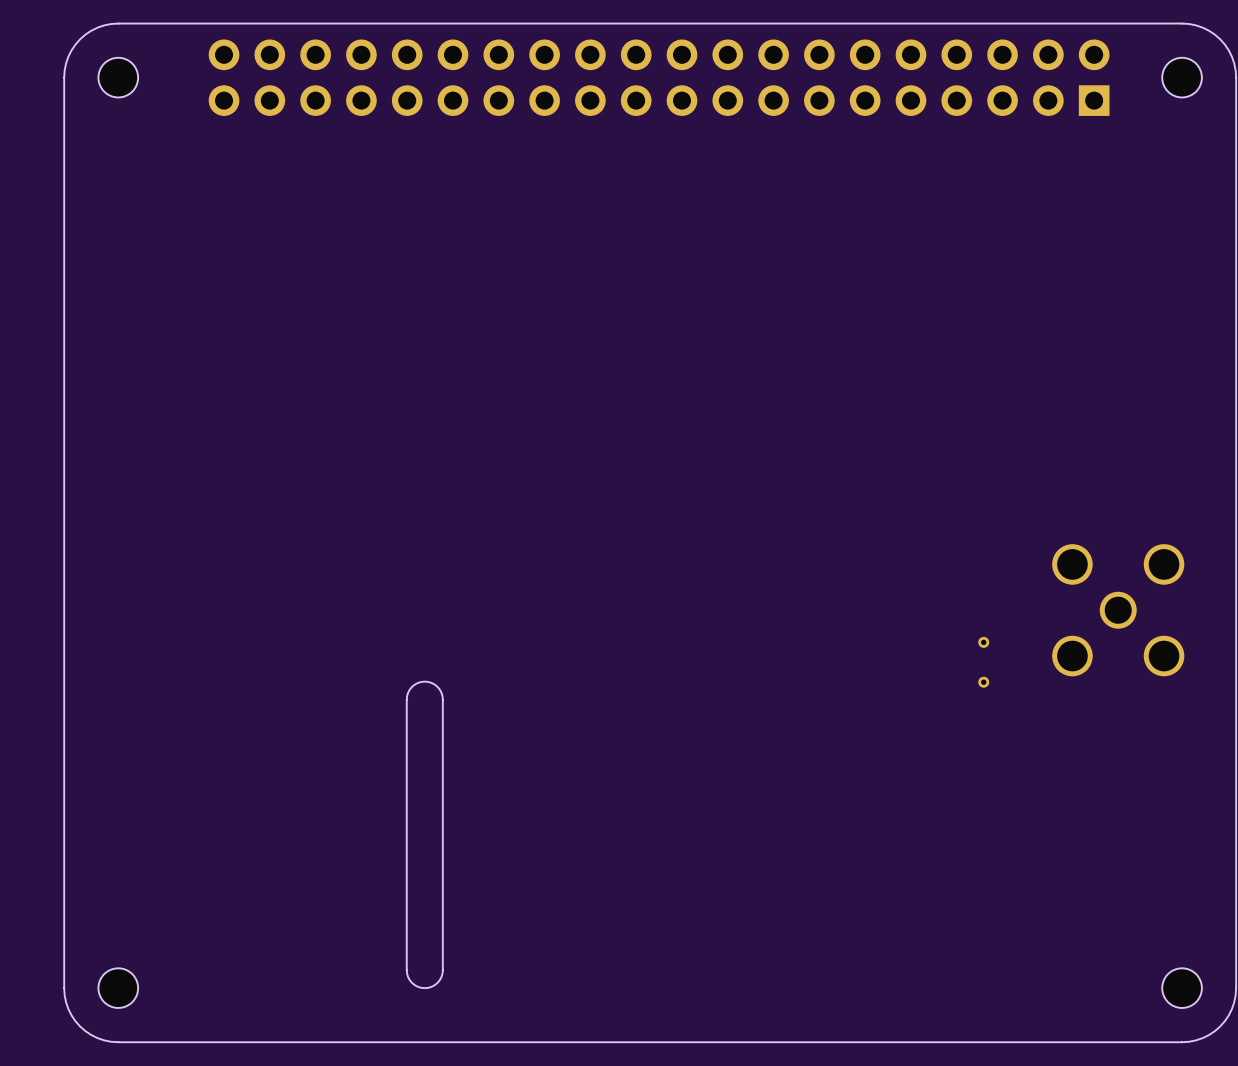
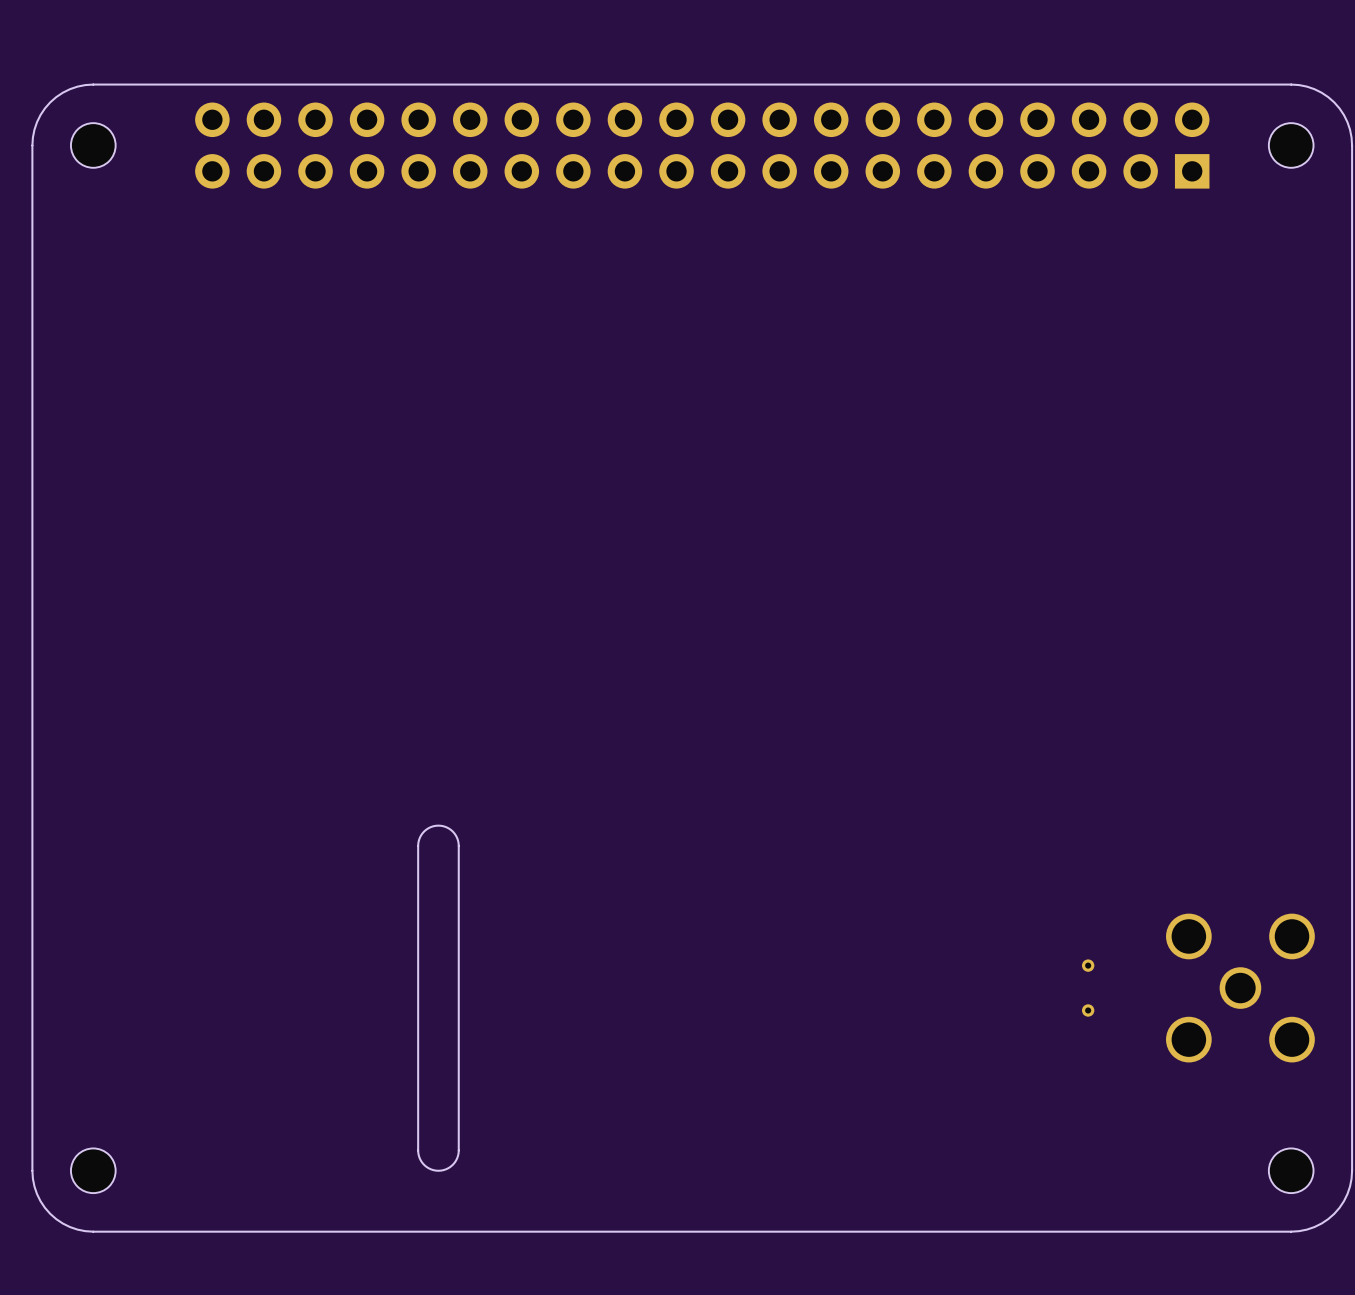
part position: (1118, 610) -> (1240, 988)
part position: (983, 662) -> (1088, 988)

